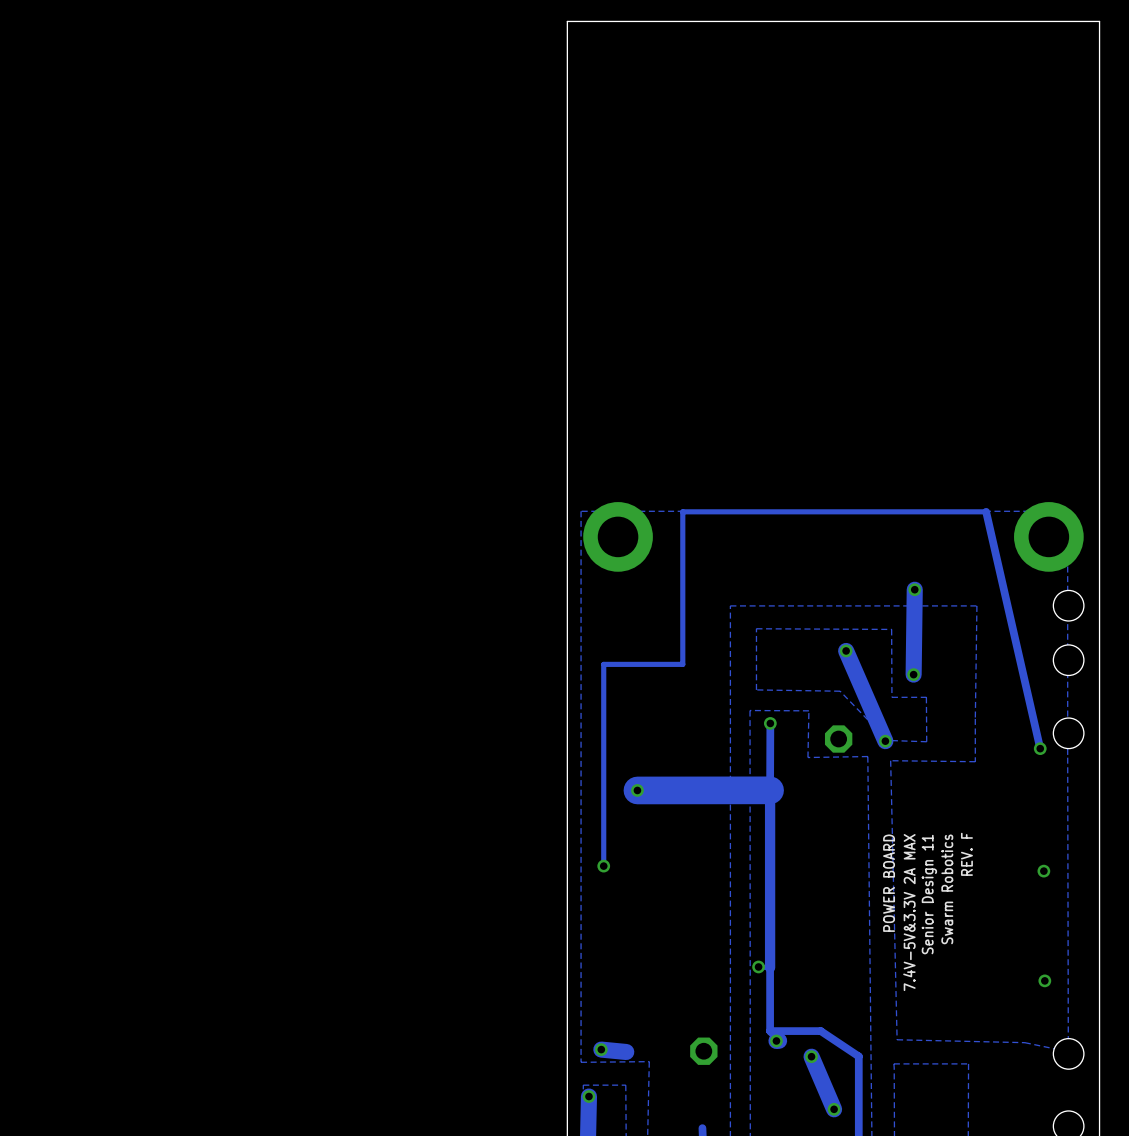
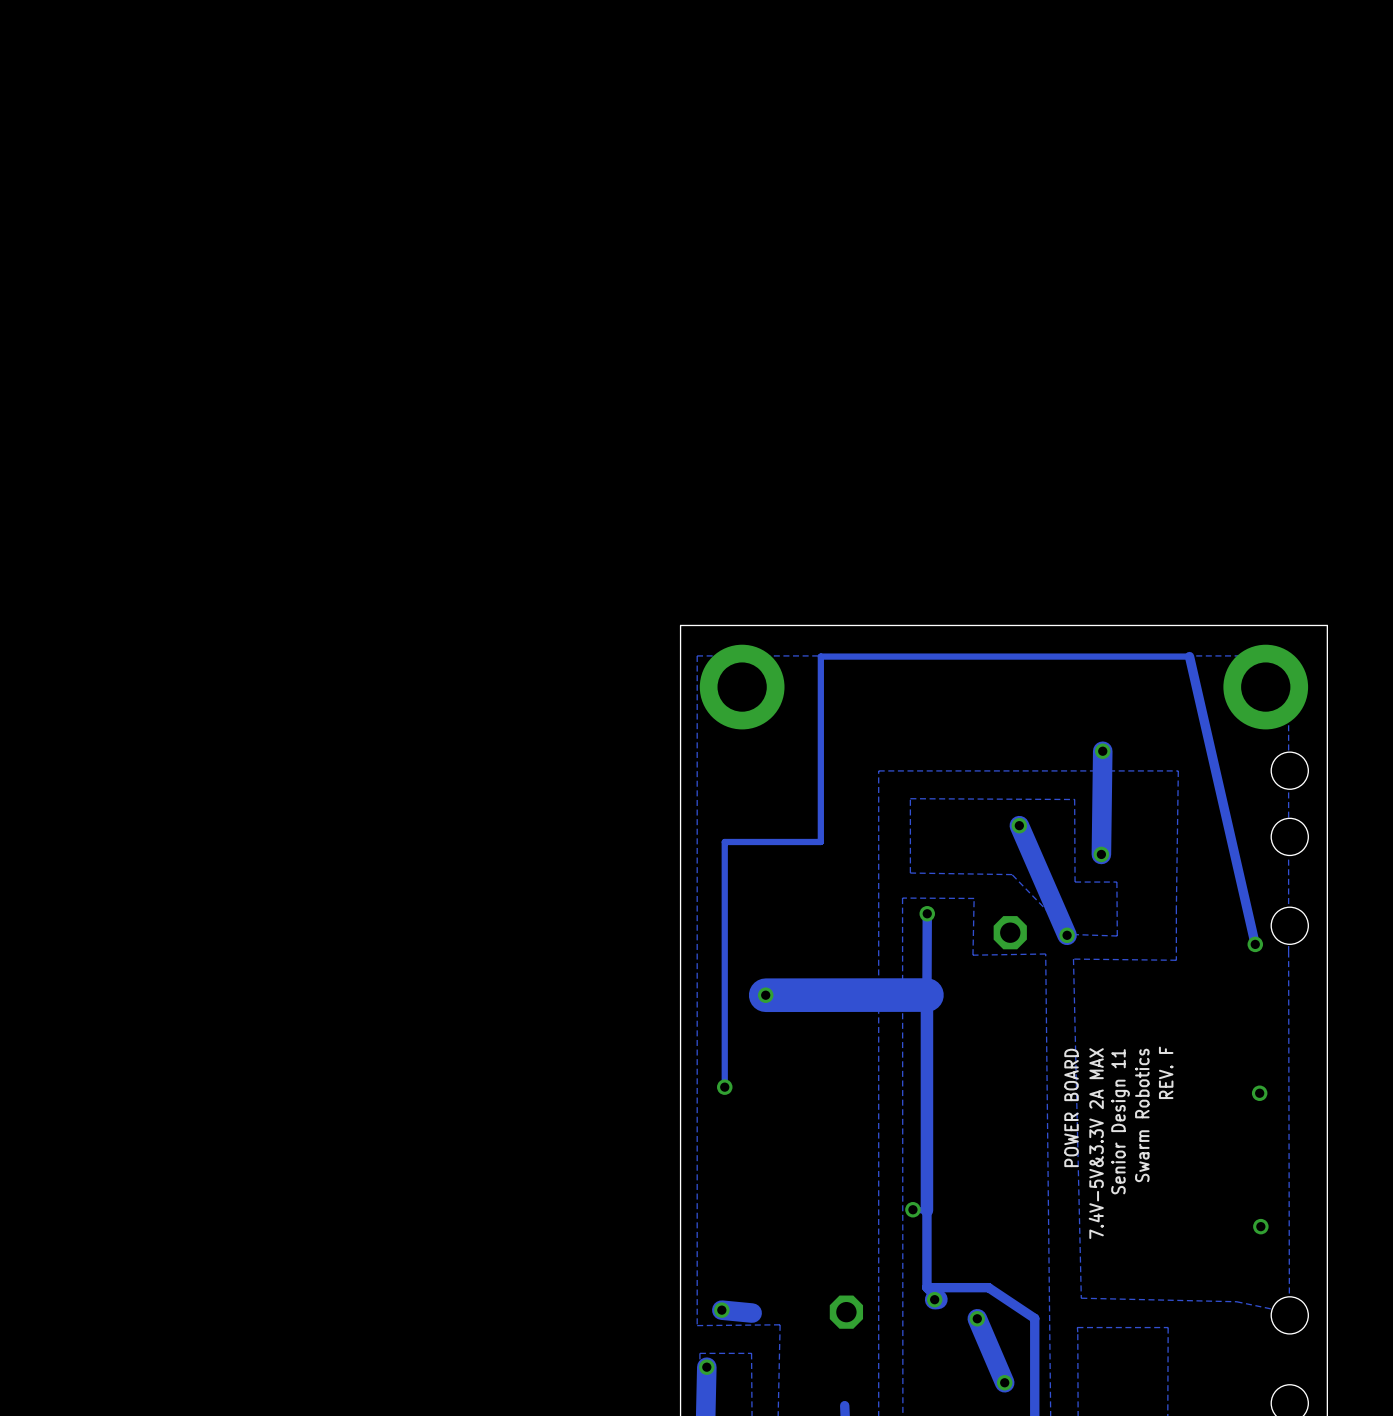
board edge: (1099, 486) (1099, 21) (567, 21) (567, 486) -> (1327, 625) (680, 625)

